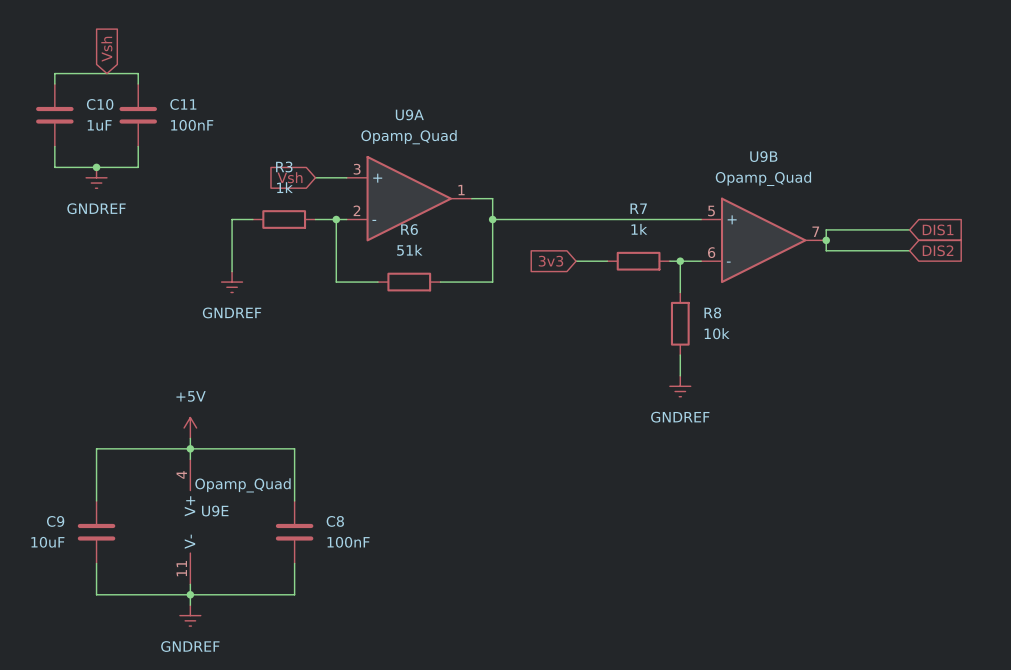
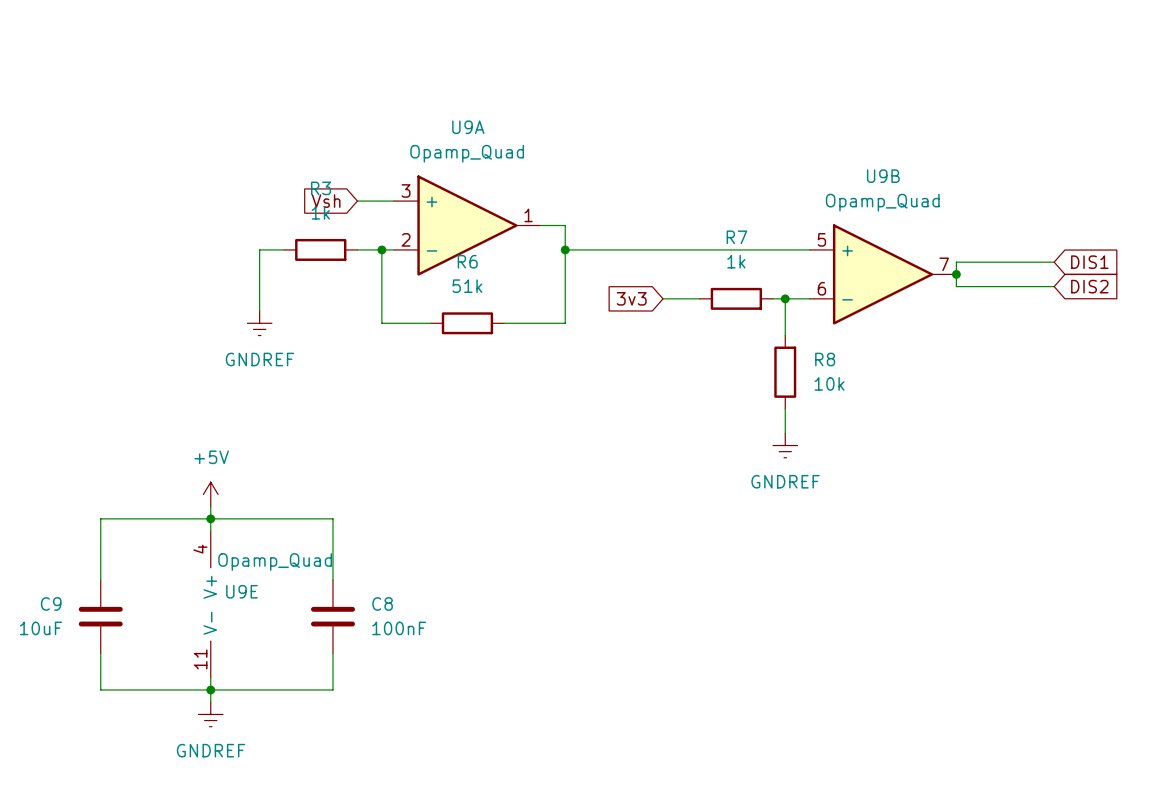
global label: Vsh (106, 49) -> none
wire: (54, 83) (54, 73) (138, 73) (138, 83) -> none
C10: 1uF (54, 115) -> none
C11: 100nF (138, 115) -> none
wire: (54, 146) (54, 167) (138, 167) (138, 146) -> none
junction: (96, 167) -> none
power symbol: GNDREF (96, 177) -> none

